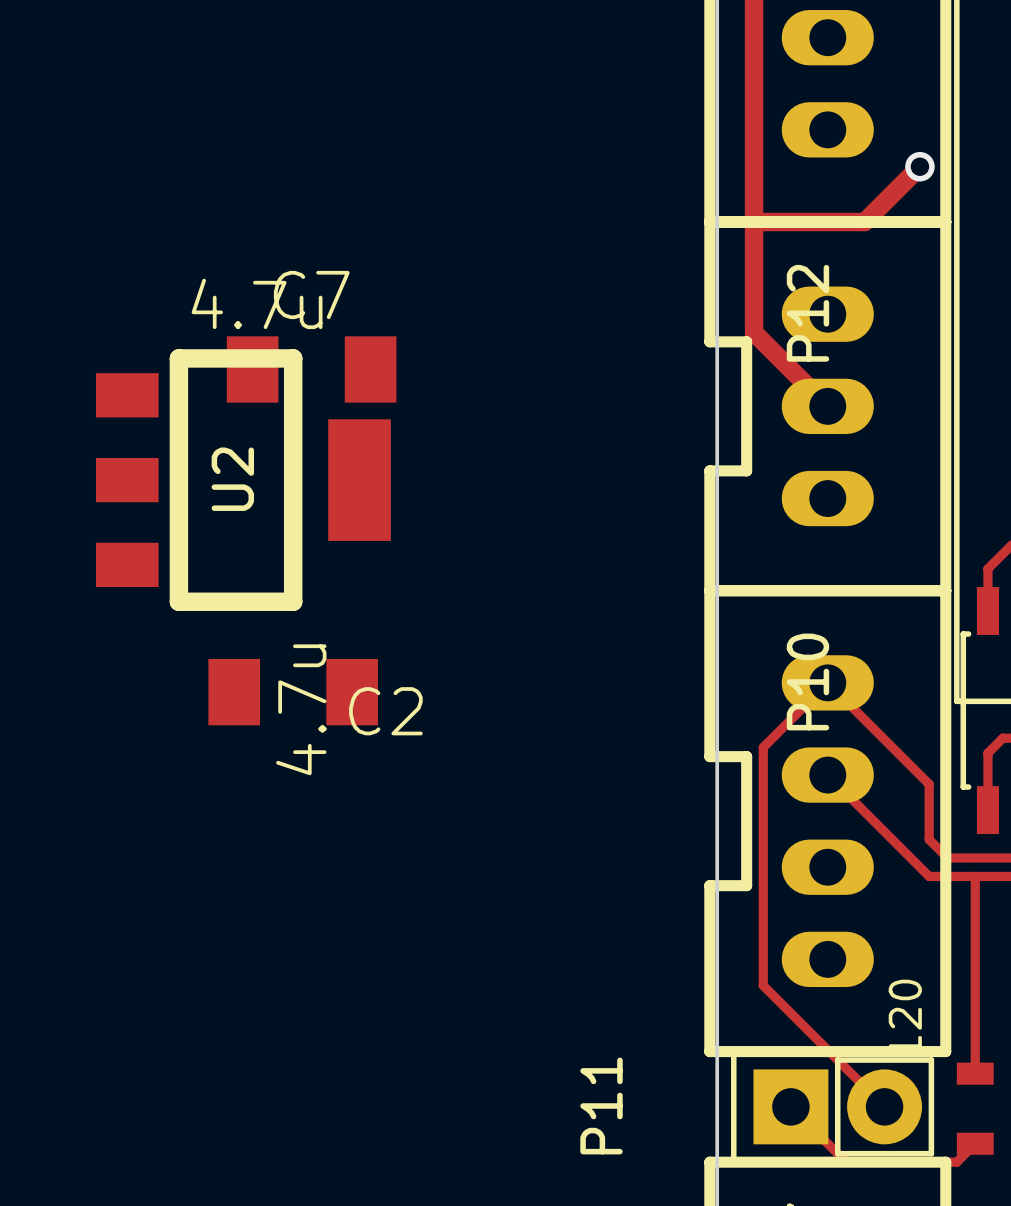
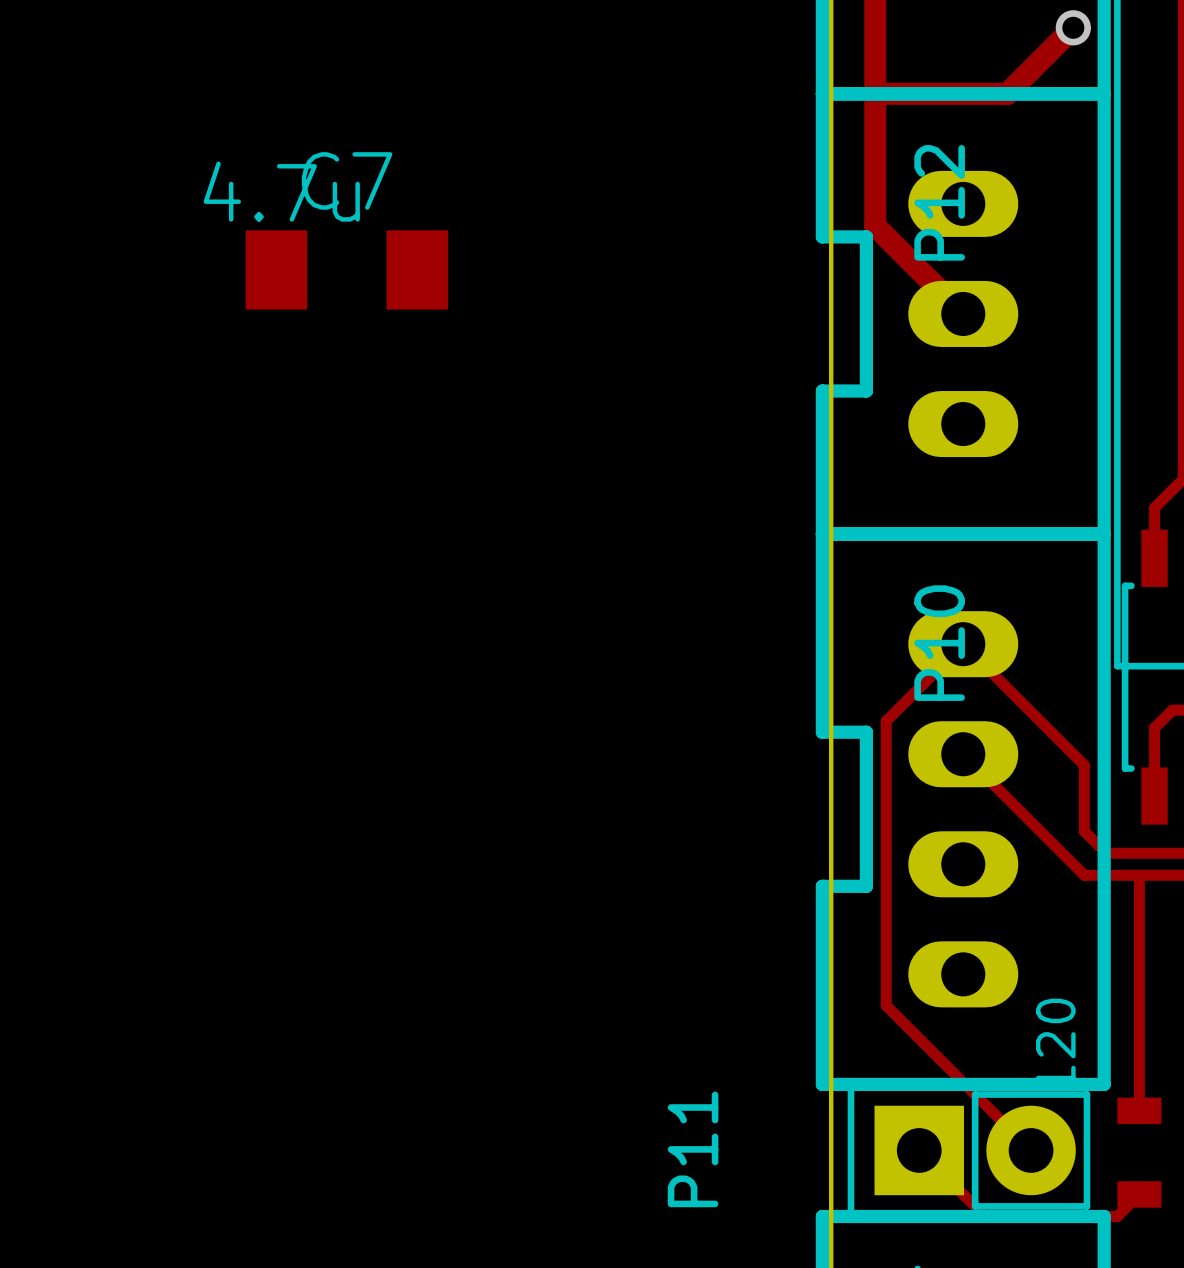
U2: (243, 480) -> none
C2: 4.7u (293, 692) -> none

